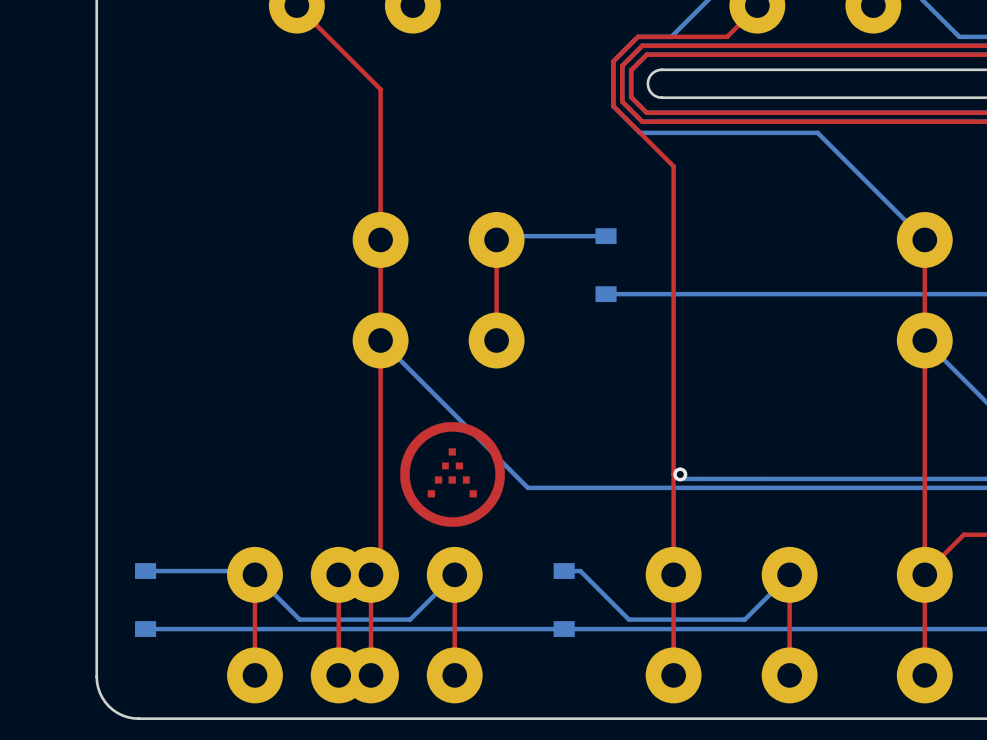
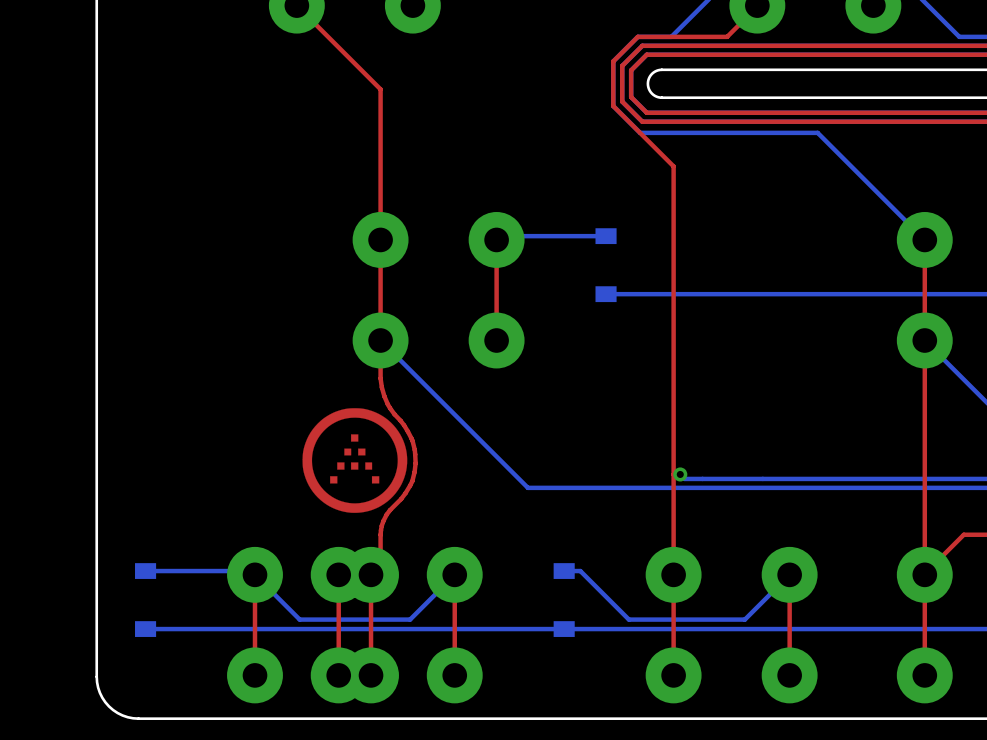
top track: (380, 378) (380, 534) -> (380, 378) (387, 404) (404, 425) (412, 440) (415, 463) (412, 481) (401, 499) (386, 514) (380, 534)
drawing position: (452, 474) -> (354, 460)

